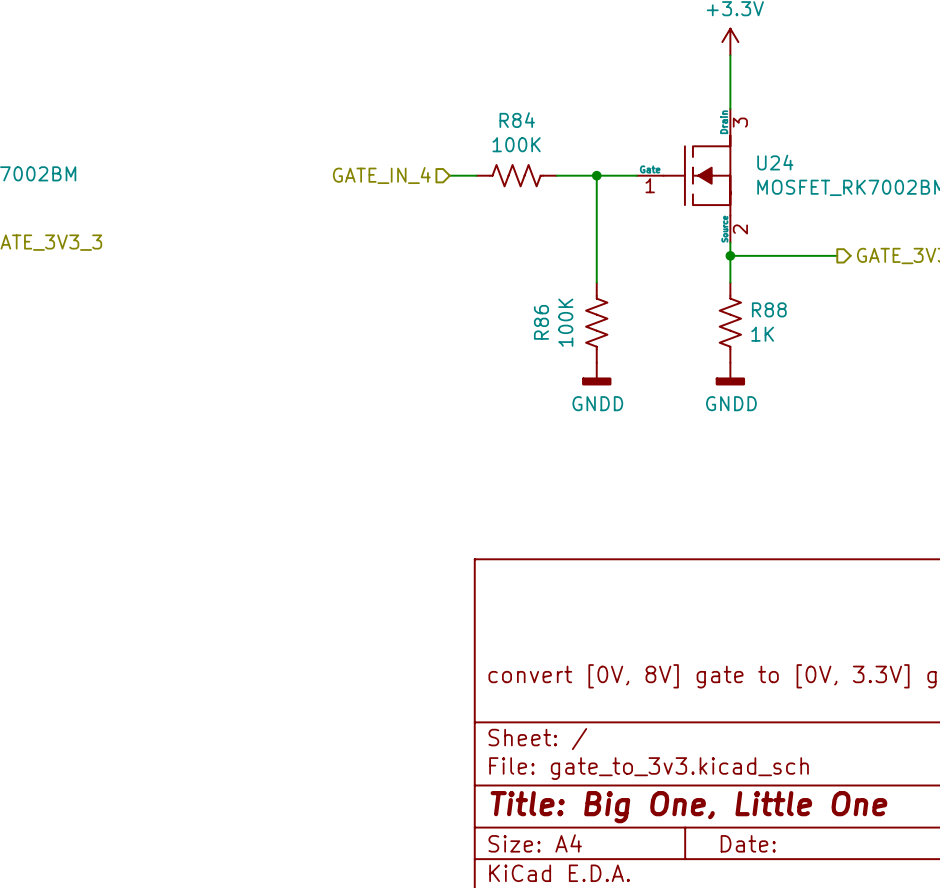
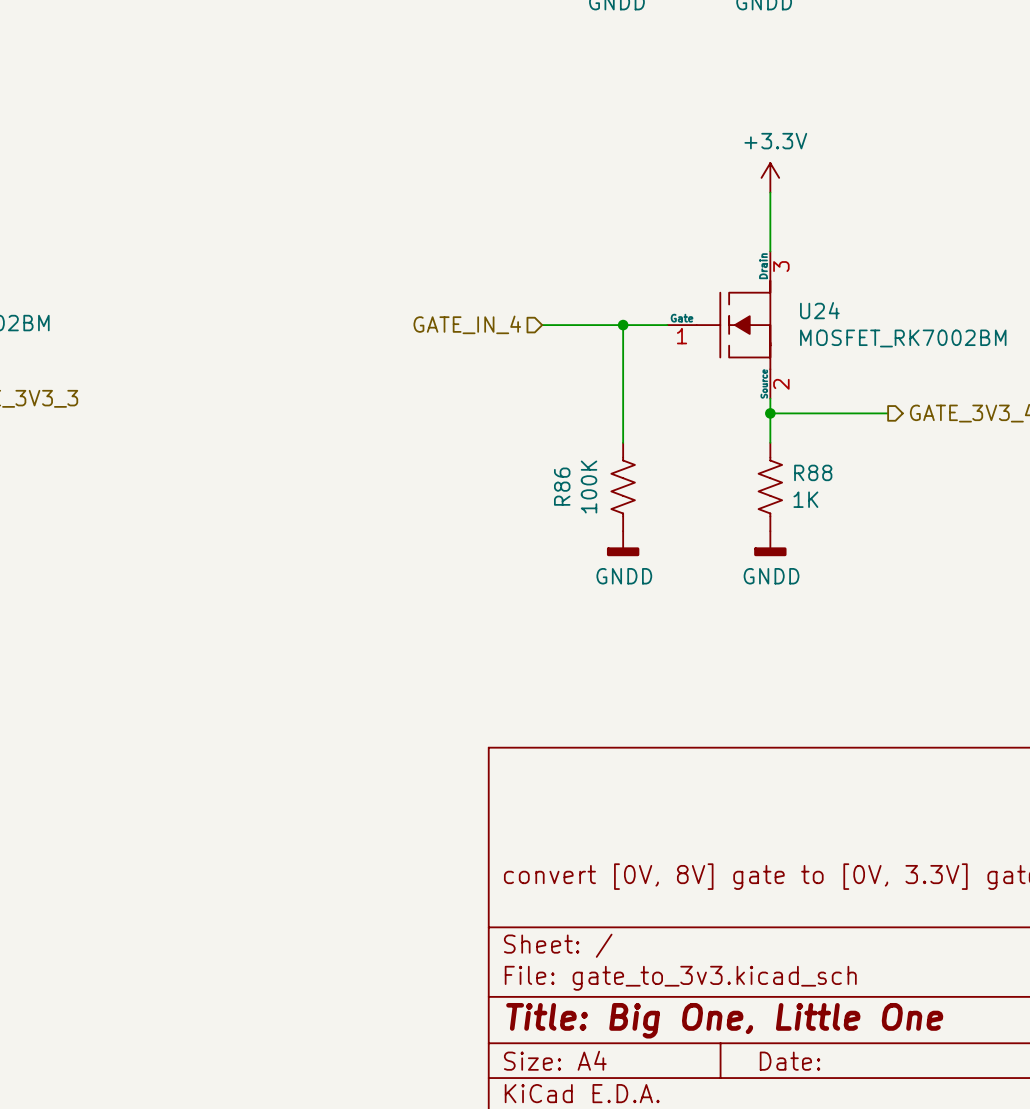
hierarchical label position: GATE_IN_4 (381, 175) -> GATE_IN_4 (467, 324)
wire: (449, 175) (476, 175) -> none
R84: 100K (516, 175) -> none

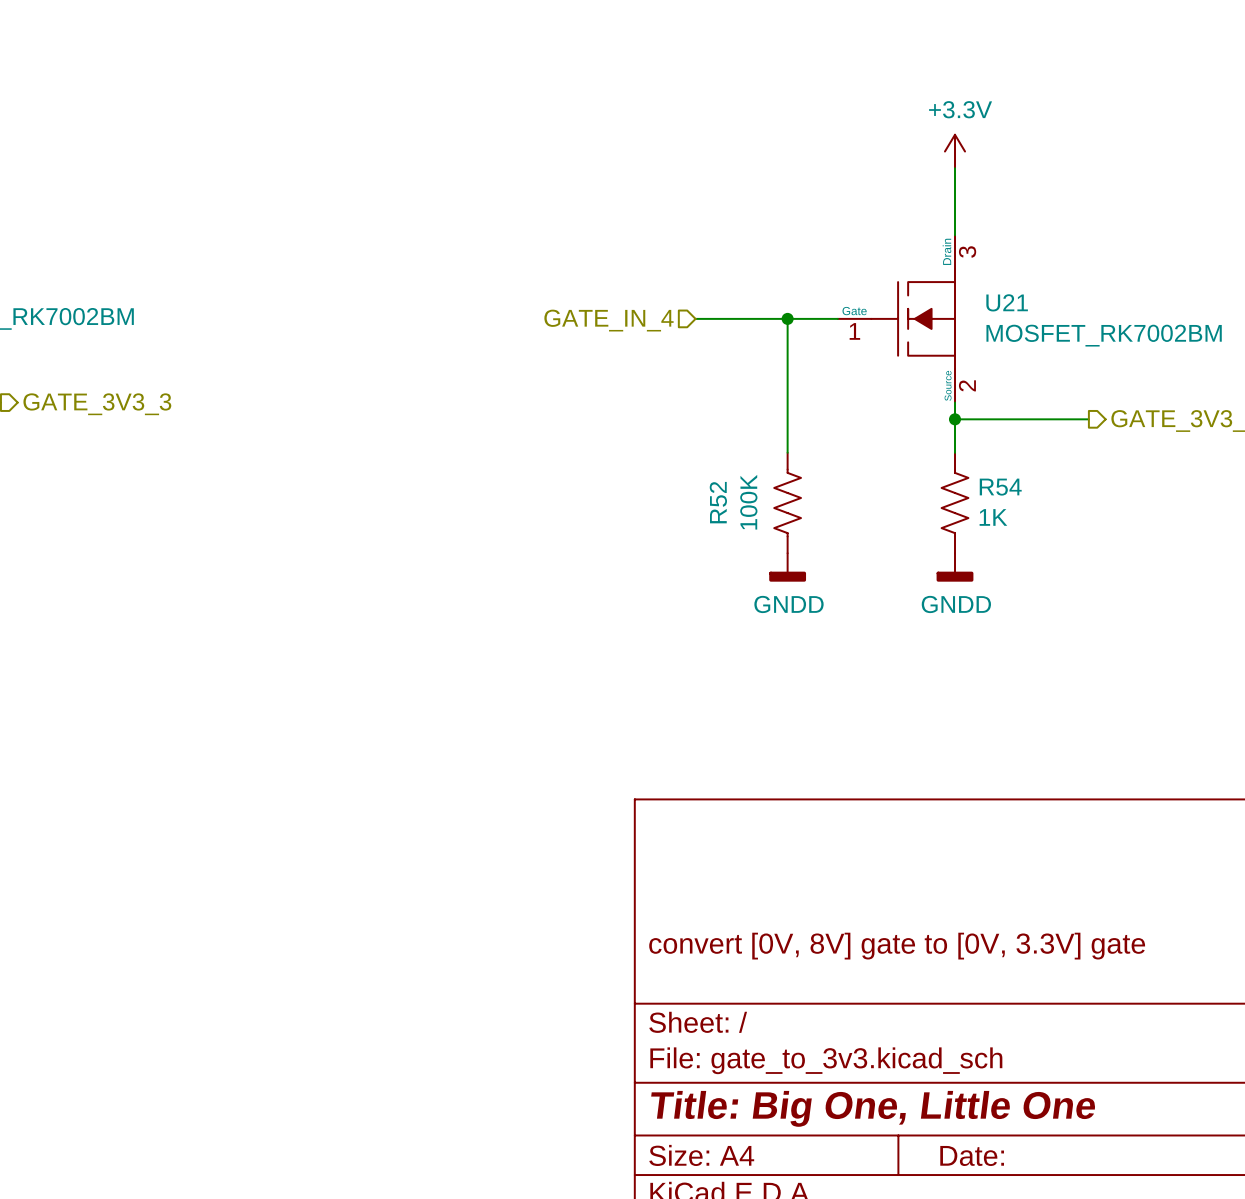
U24 name: U24 (819, 310) -> U21 (1007, 302)
R88 name: R88 (813, 472) -> R54 (1000, 487)
R86 name: R86 (562, 486) -> R52 (718, 502)

